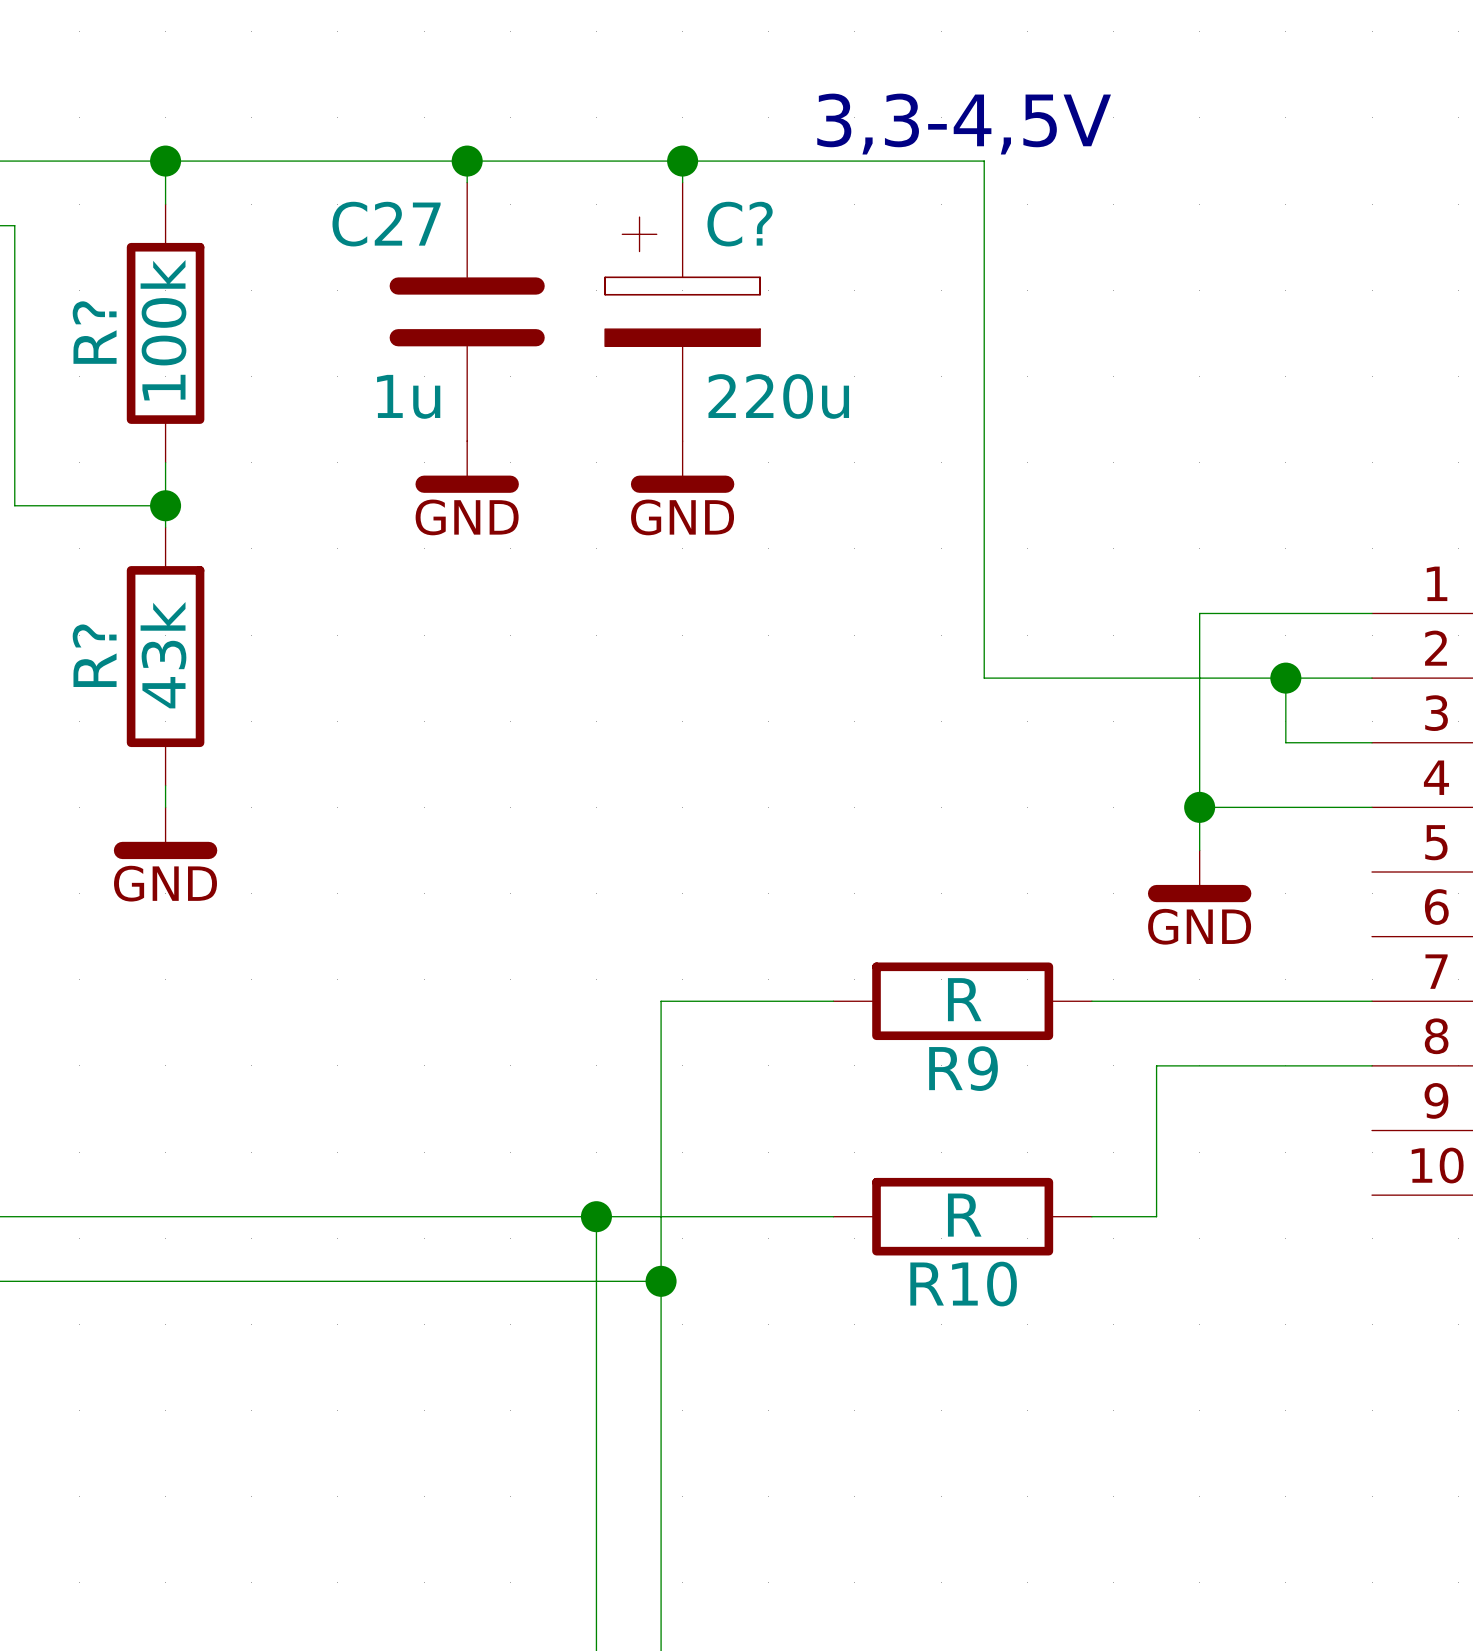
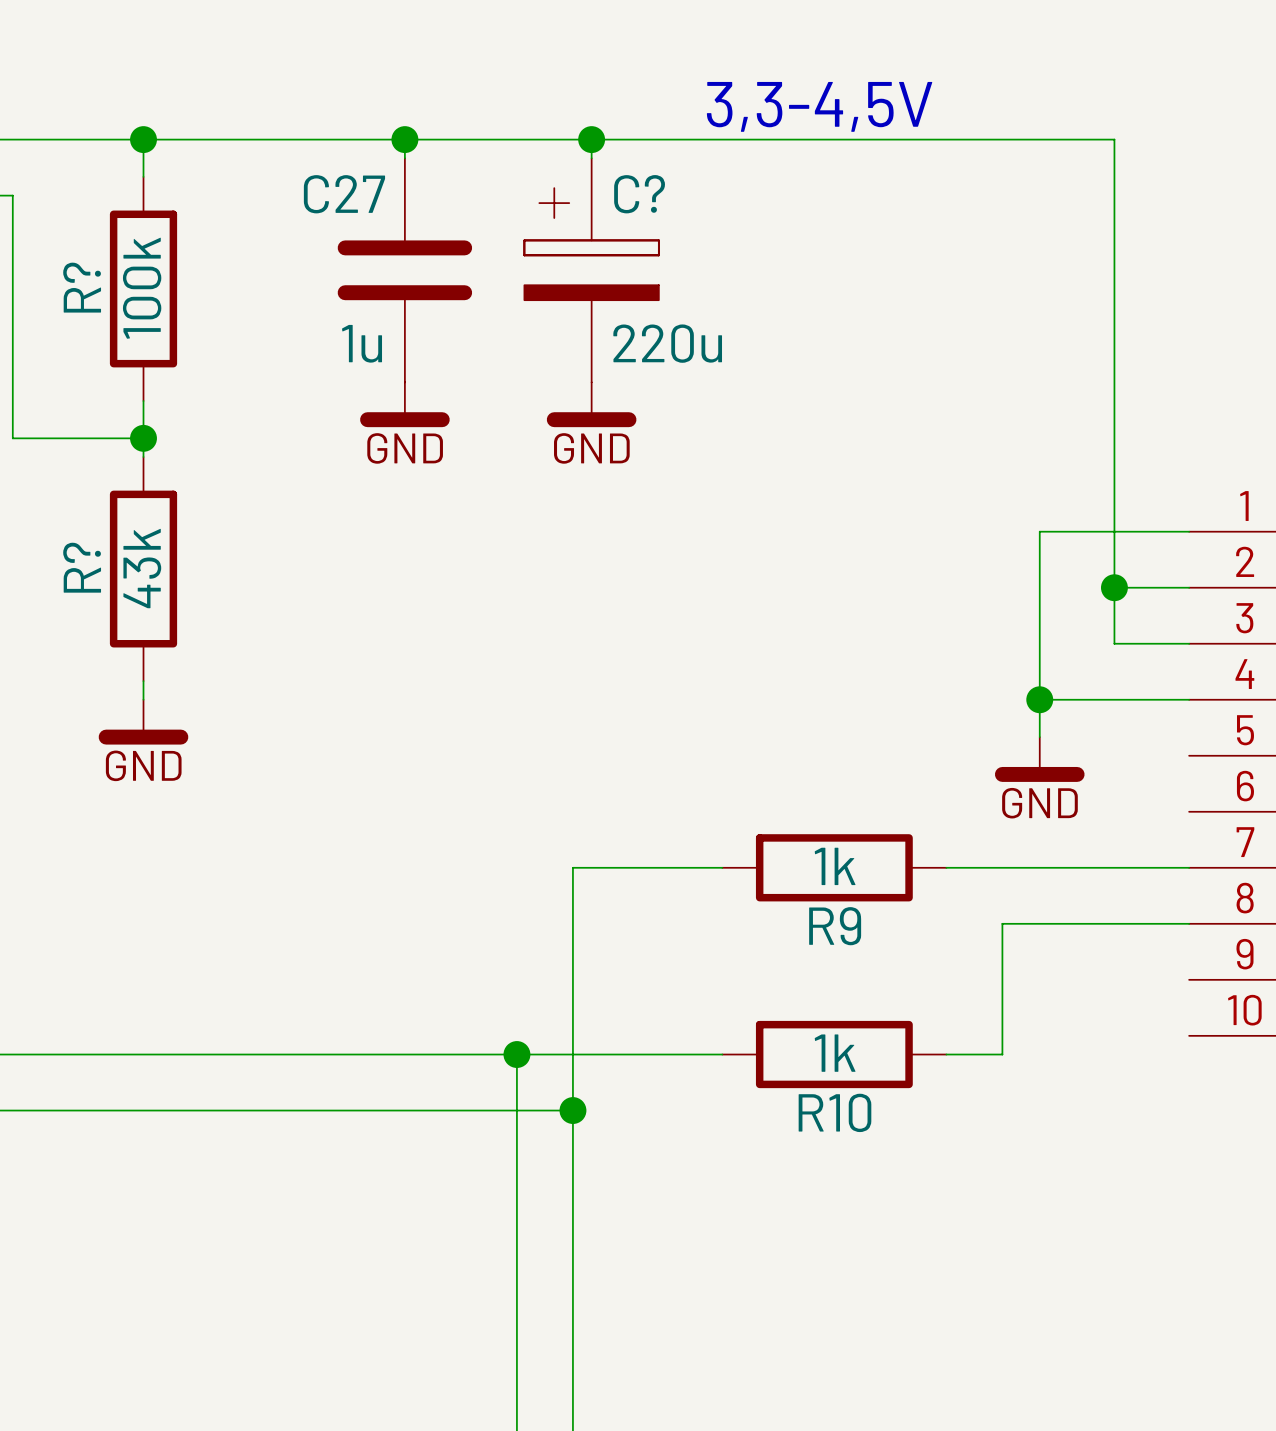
wire: (984, 161) (984, 678) (1285, 678) -> (853, 139) (1114, 139) (1114, 587)
R9 value: R (964, 999) -> 1k (835, 866)
R10 value: R (964, 1215) -> 1k (835, 1053)

